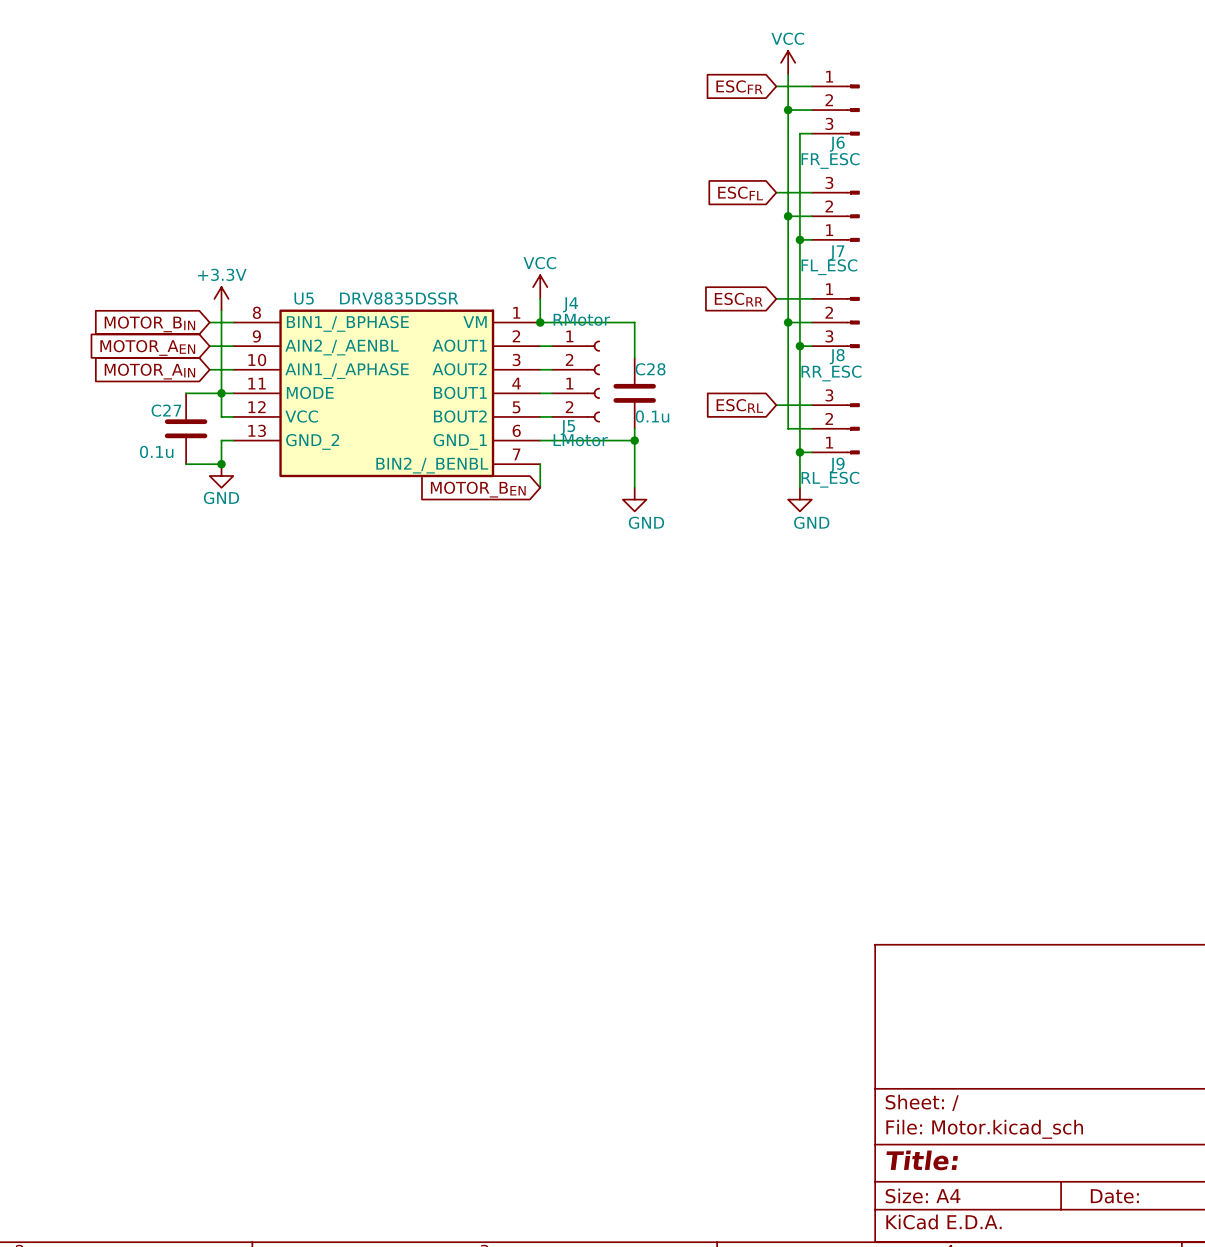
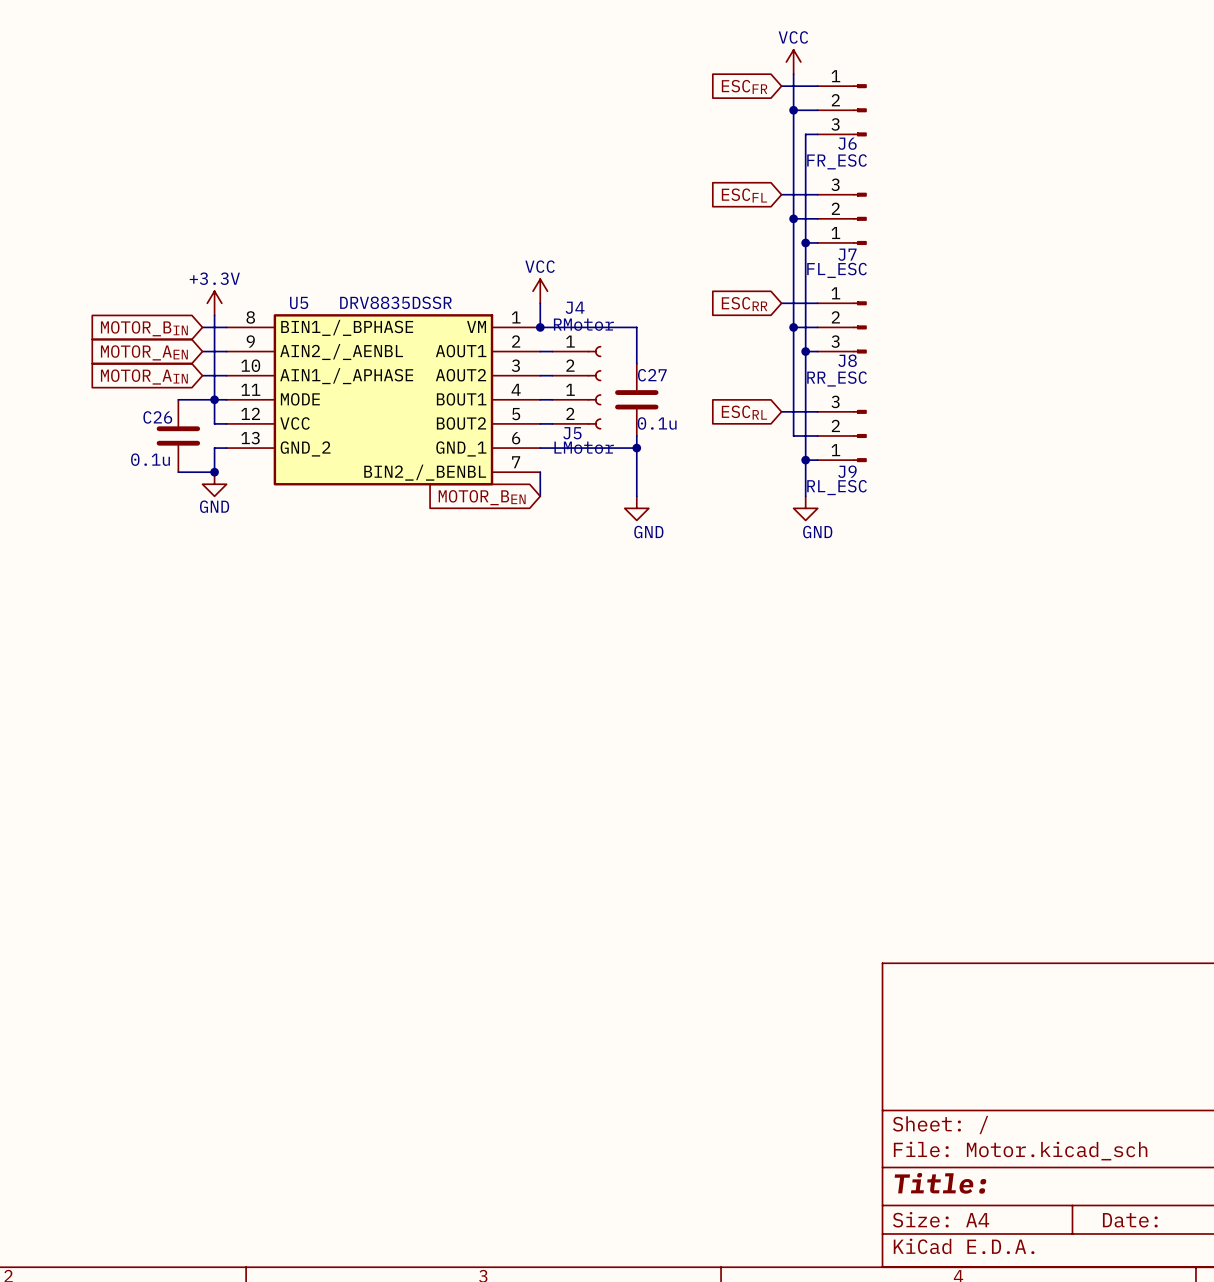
C28 name: C28 (650, 369) -> C27 (652, 375)
C27 name: C27 (166, 410) -> C26 (157, 417)

